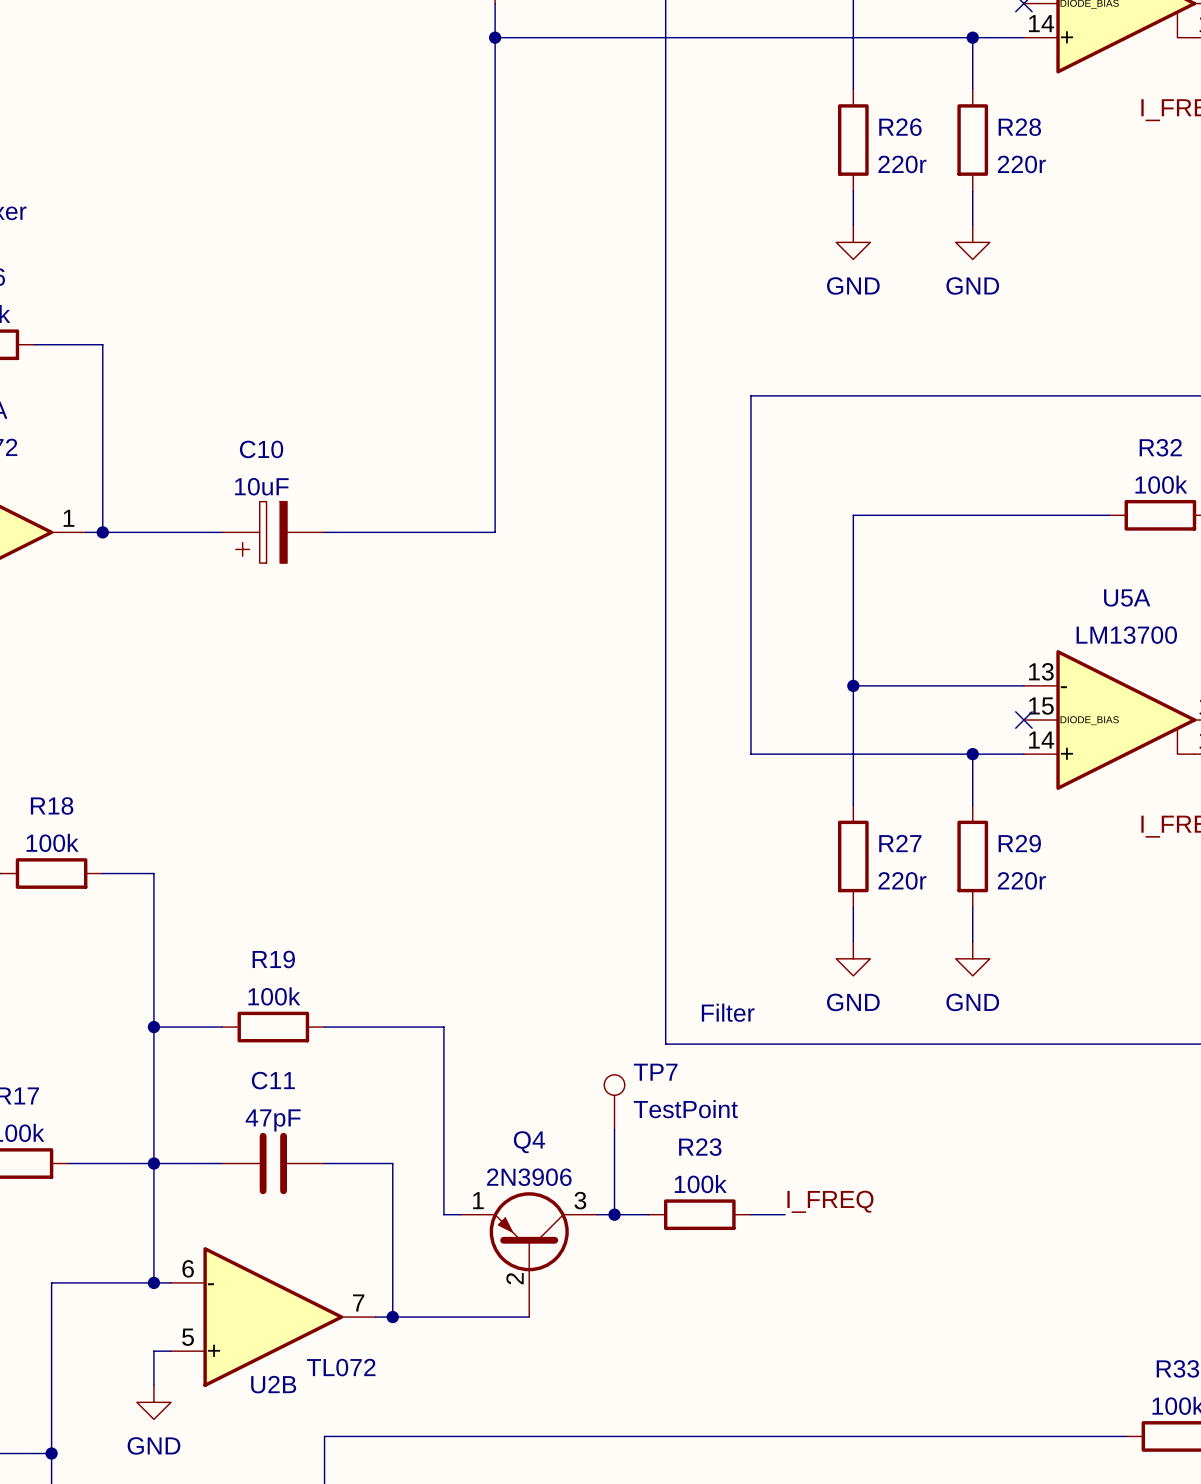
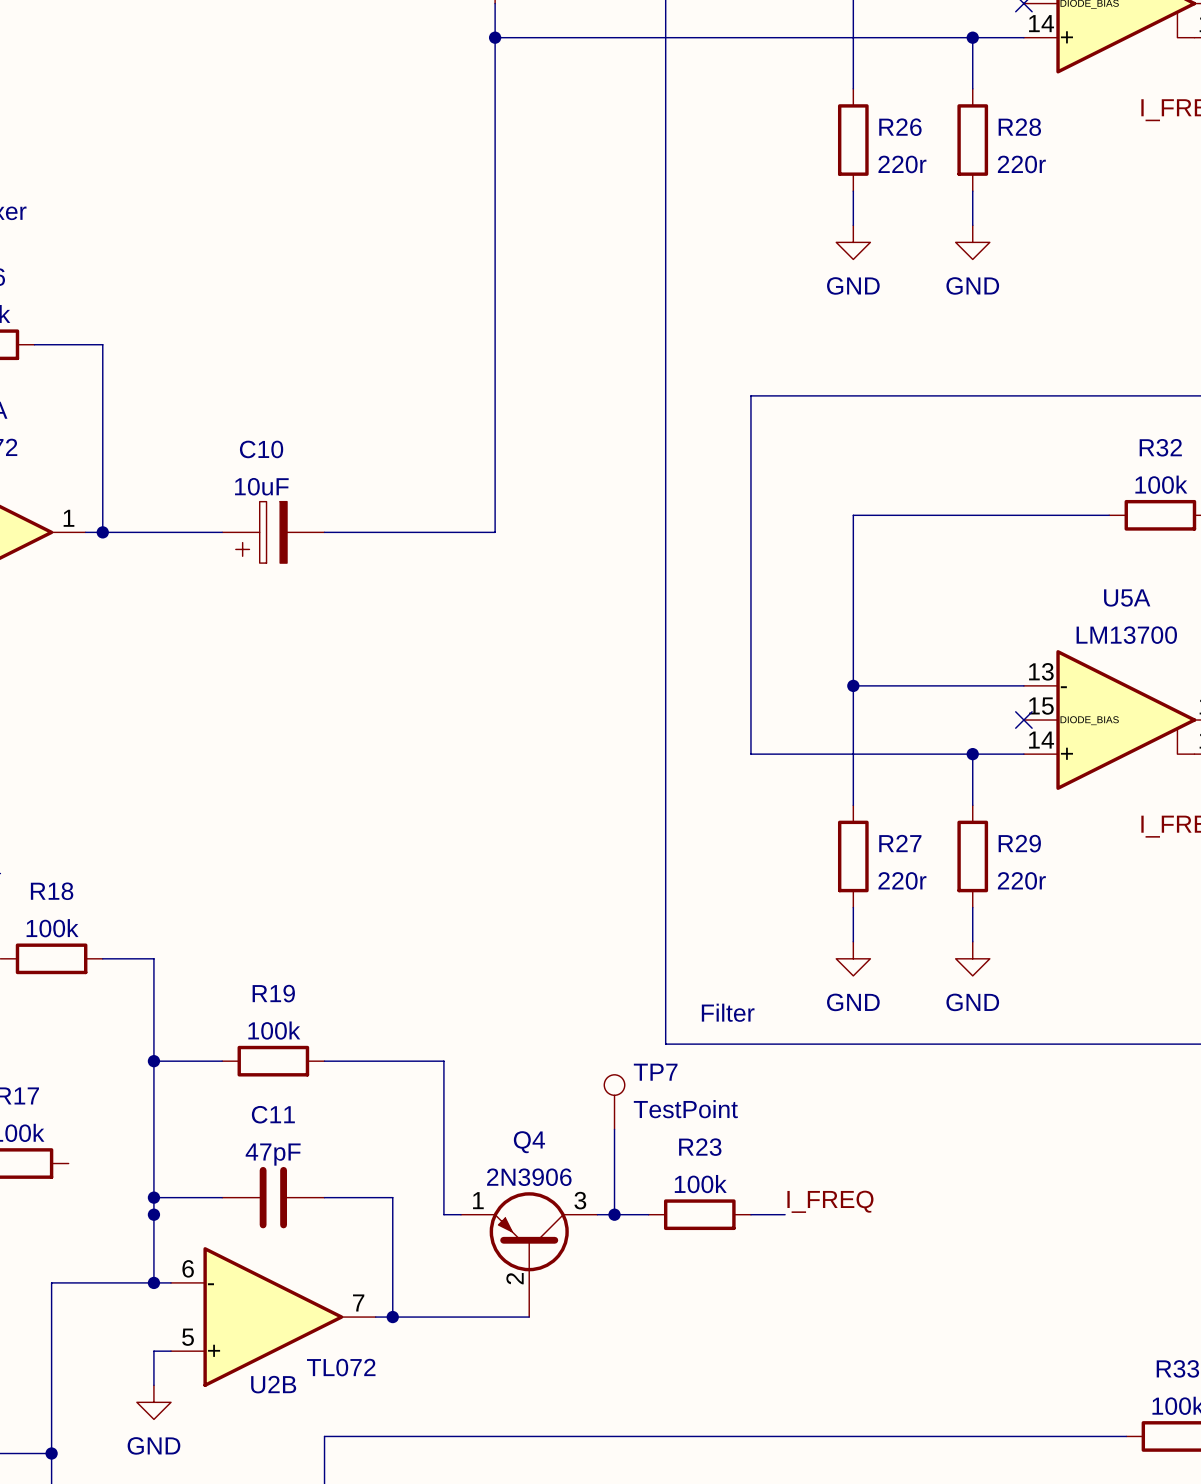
R18 position: (51, 873) -> (51, 958)
wire: (102, 873) (153, 873) (153, 958) -> (102, 958) (153, 958)
wire: (153, 1027) (222, 1027) -> (153, 1061) (222, 1061)
junction position: (153, 1027) -> (153, 1061)
R19 position: (273, 1027) -> (273, 1061)
wire: (324, 1027) (443, 1027) (443, 1061) -> (324, 1061) (443, 1061)
wire: (68, 1163) (222, 1163) -> none
junction: (153, 1163) -> none
C11 position: (273, 1163) -> (273, 1197)
wire: (324, 1163) (392, 1163) (392, 1197) -> (324, 1197) (392, 1197)
wire: none -> (153, 1197) (222, 1197)
junction: none -> (153, 1197)
junction: none -> (153, 1214)

